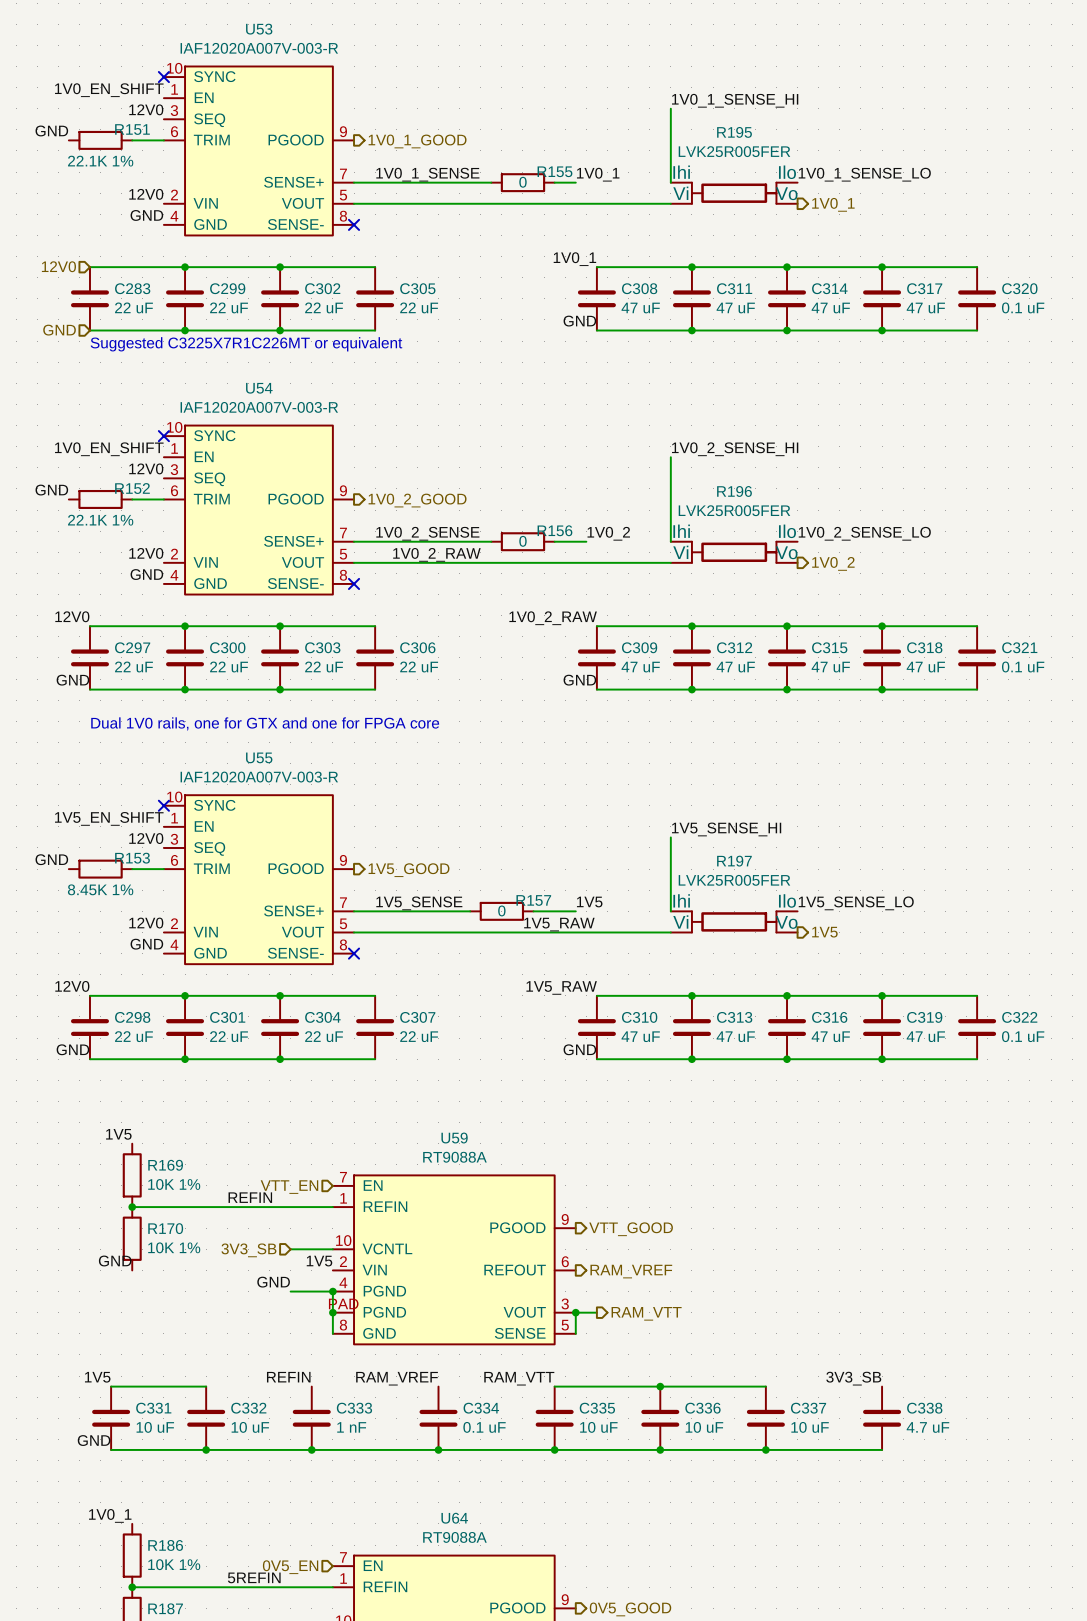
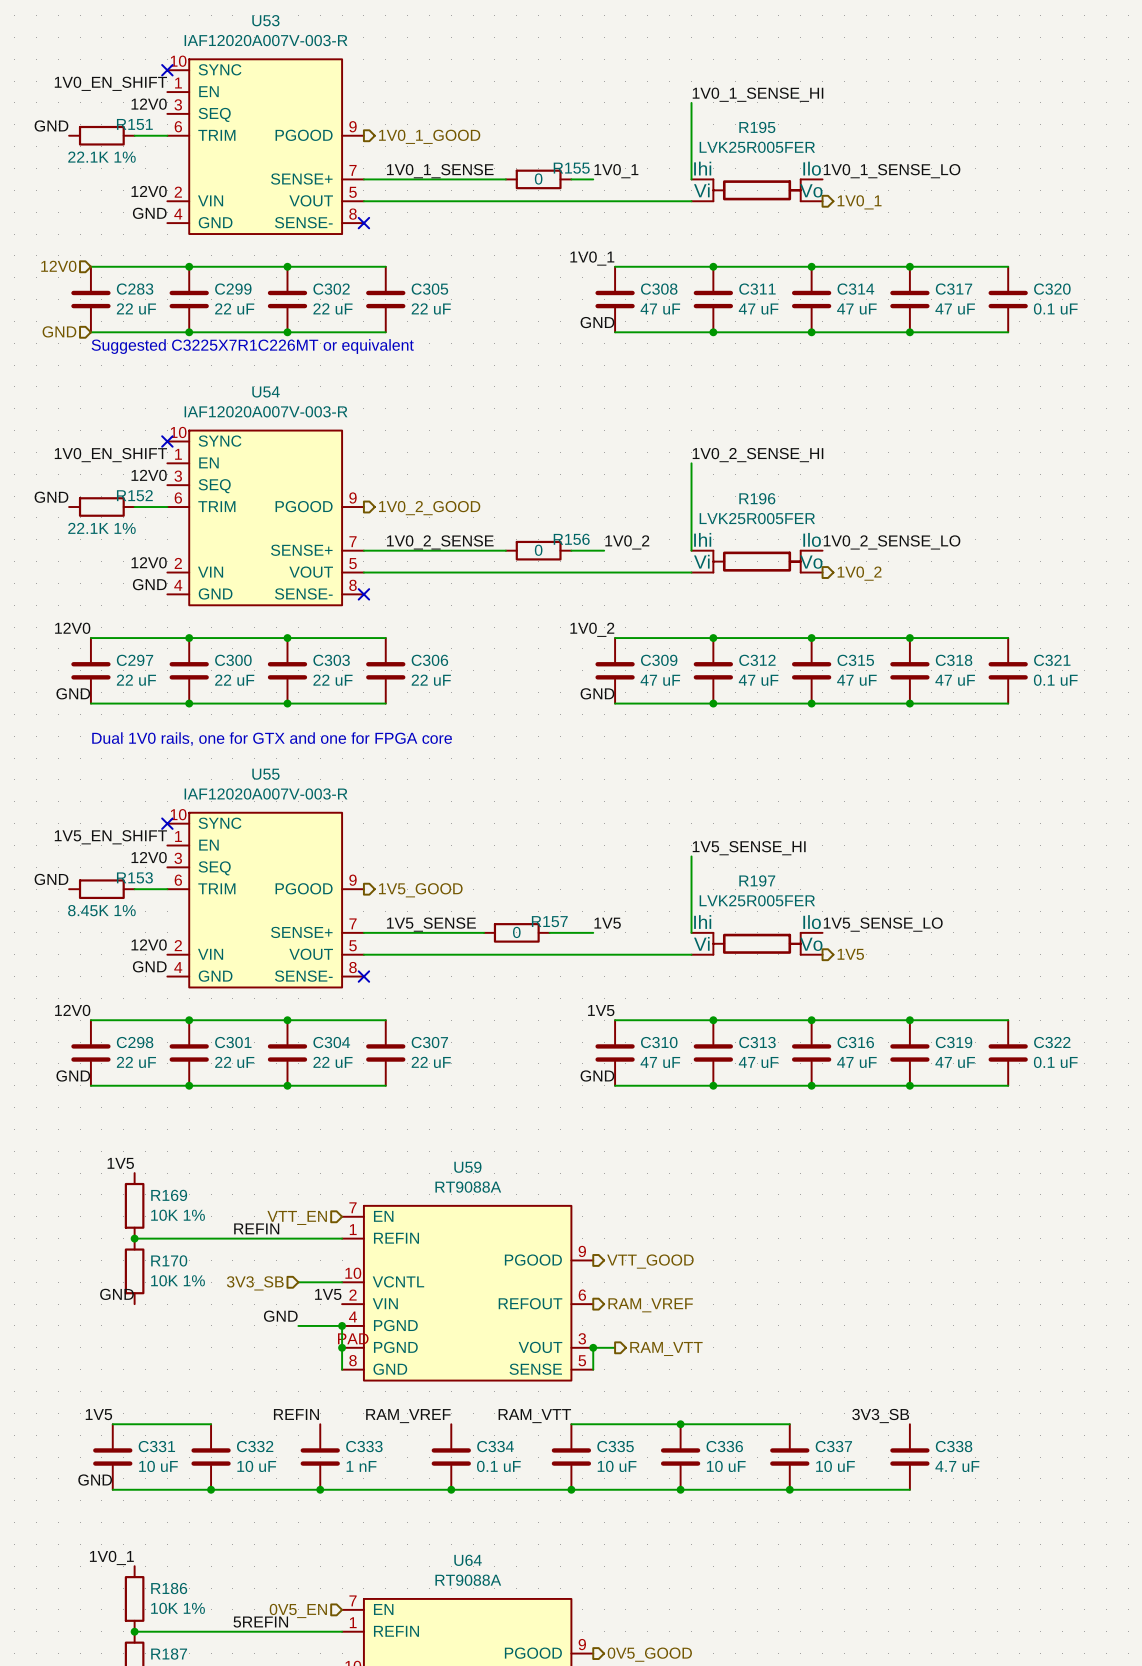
label: 1V0_2_RAW (436, 554) -> none
label: 1V0_2_RAW (553, 618) -> 1V0_2 (592, 629)
label: 1V5_RAW (559, 924) -> none
label: 1V5_RAW (561, 987) -> 1V5 (601, 1010)

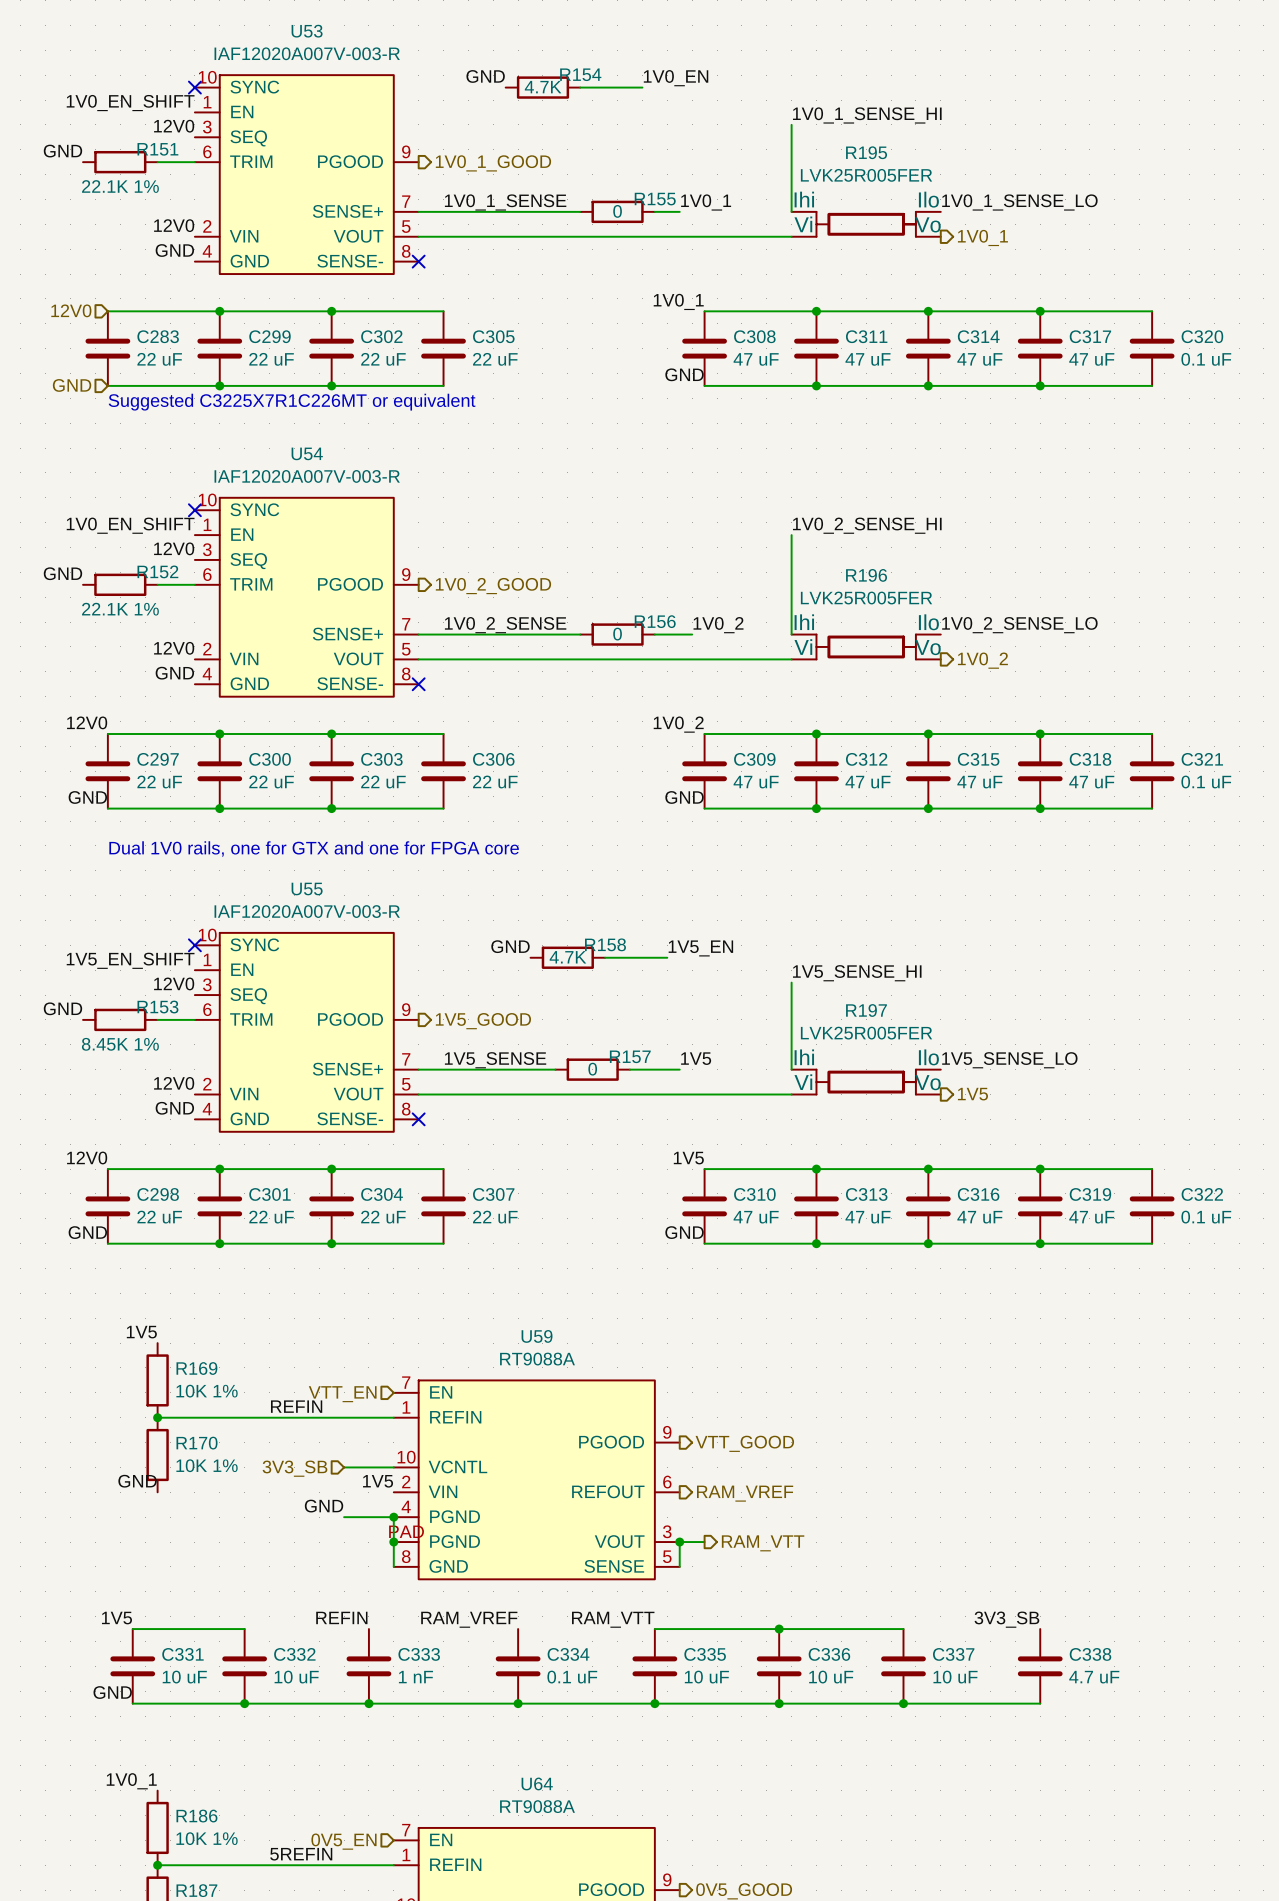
label: none -> GND (485, 76)
label: none -> 1V0_EN (676, 78)
R154: none -> 4.7K (542, 87)
wire: none -> (580, 87) (642, 87)
label: none -> GND (510, 946)
label: none -> 1V5_EN (700, 948)
R158: none -> 4.7K (567, 957)
wire: none -> (605, 957) (667, 957)

